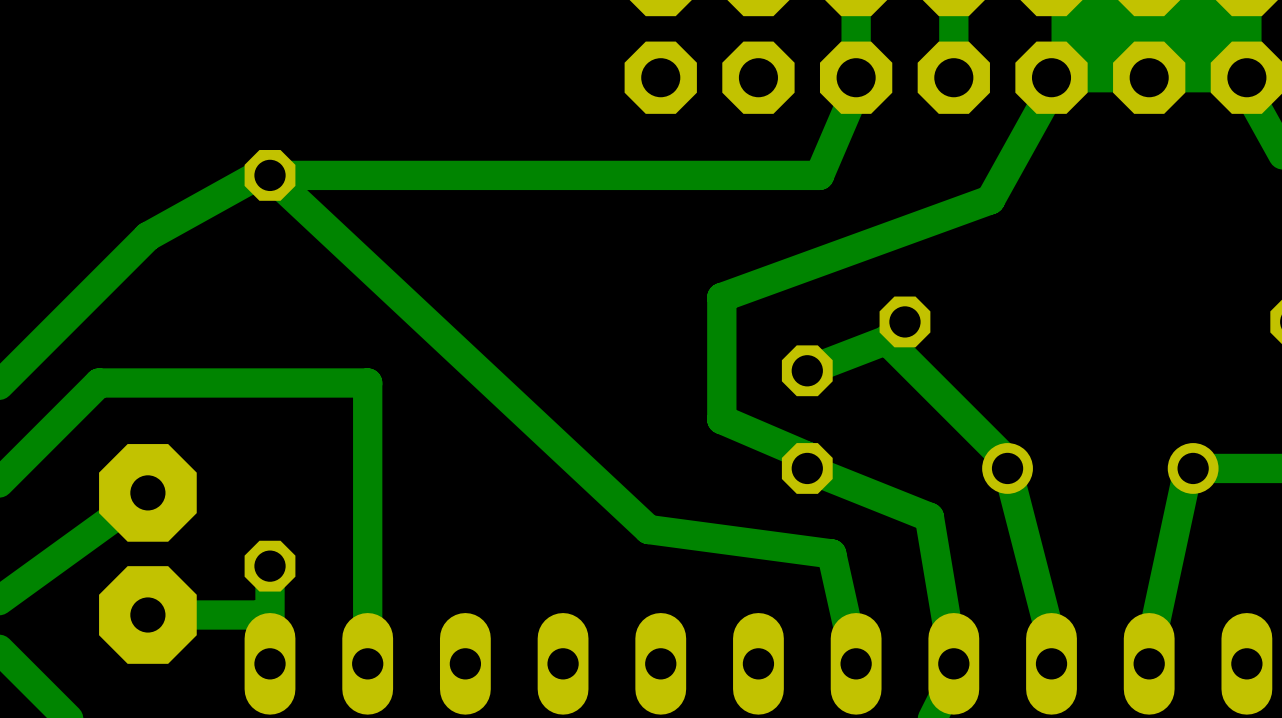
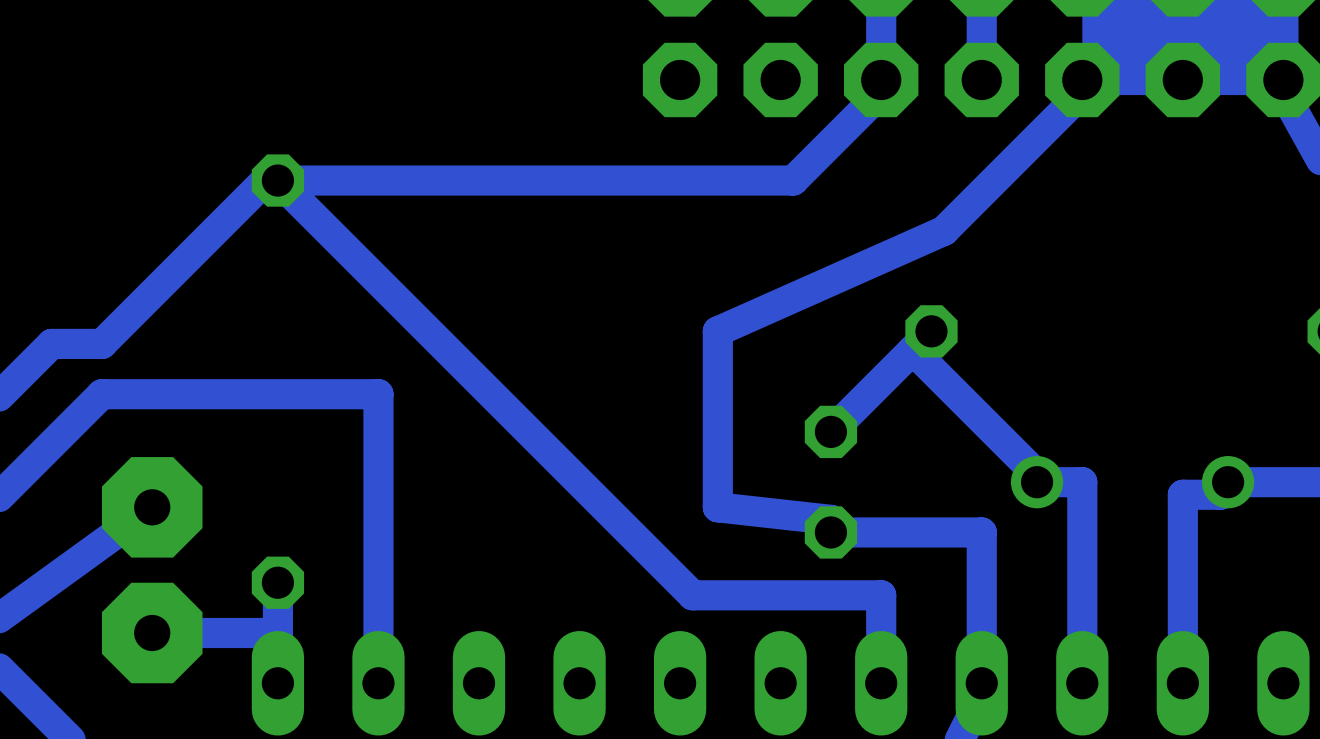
track: (856, 89) (819, 175) (770, 175) -> (881, 92) (793, 180)
track: (1051, 89) (990, 199) (721, 297) (721, 419) (807, 456) (807, 468) (929, 517) (953, 663) -> (1082, 92) (944, 230) (717, 331) (717, 507) (830, 519) (830, 532) (981, 532) (981, 683)
track: (257, 175) (147, 236) (50, 334) -> (265, 180) (101, 343) (51, 343)
track: (270, 175) (648, 529) (831, 553) (856, 663) -> (277, 180) (692, 595) (881, 595) (881, 683)
track: (886, 340) (807, 370) -> (912, 350) (830, 431)
part position: (807, 419) -> (830, 482)
track: (1007, 468) (1051, 639) -> (1037, 482) (1082, 482) (1082, 658)
track: (1185, 480) (1149, 651) -> (1220, 494) (1182, 494) (1182, 670)

